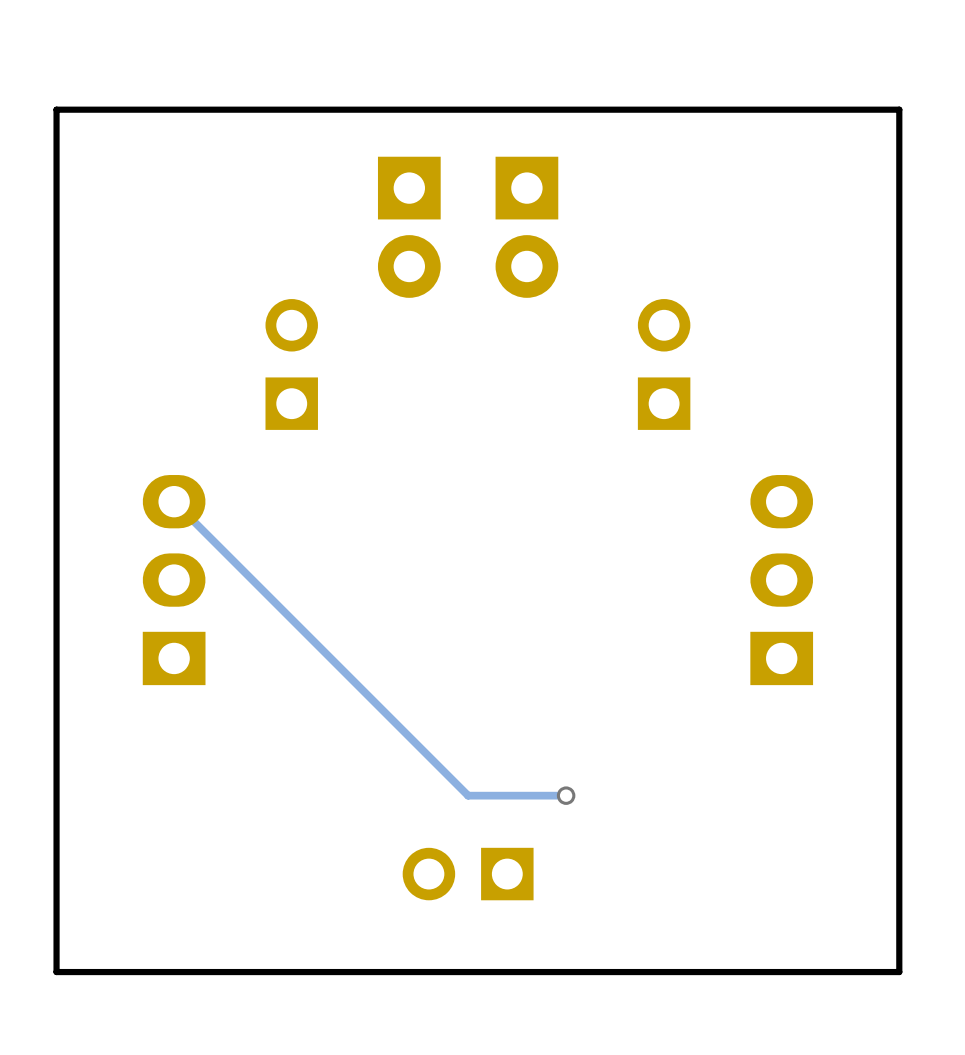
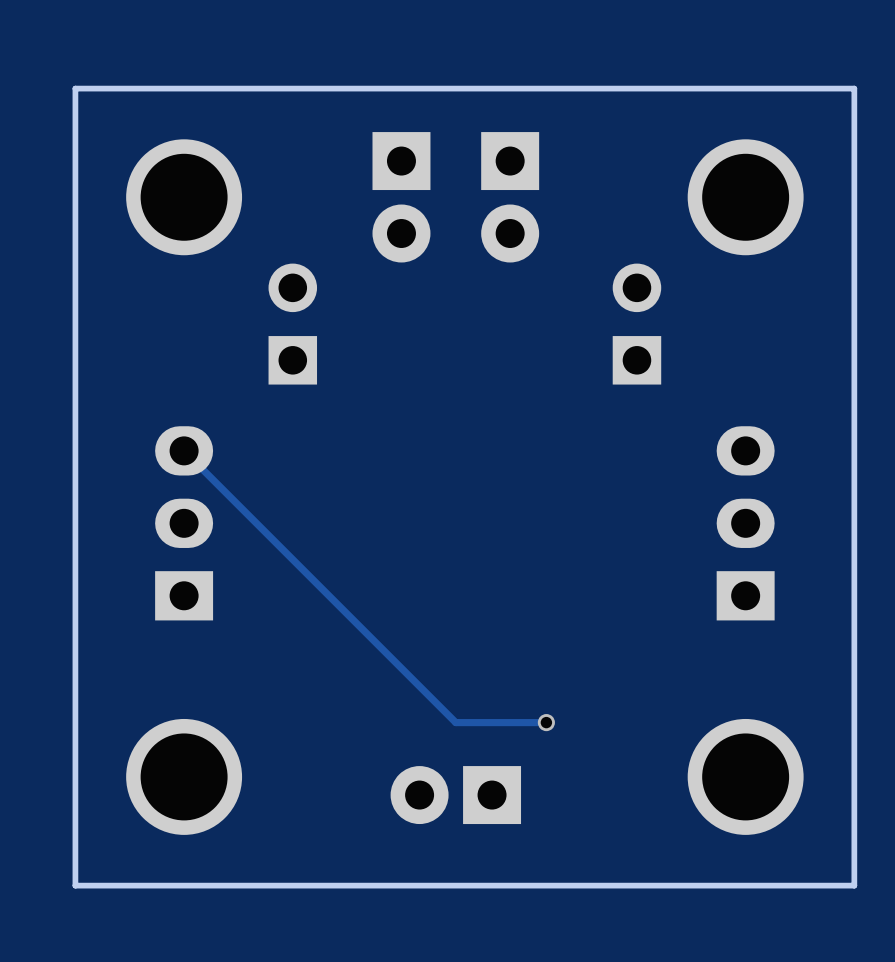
part: none -> (184, 197)
part: none -> (745, 197)
part footprint: [402, 847, 534, 901] -> [390, 766, 522, 825]
part: none -> (184, 776)
part: none -> (745, 776)

